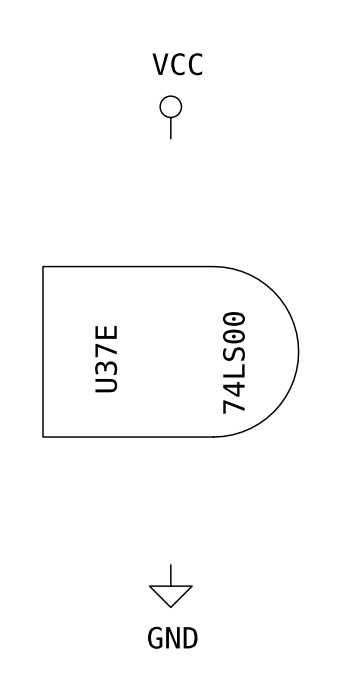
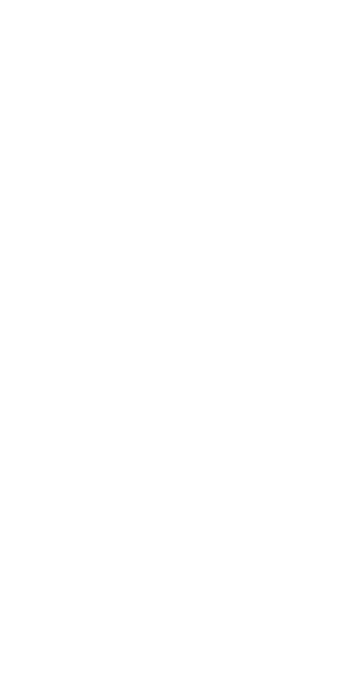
power symbol: VCC (170, 117) -> none
U37E: 74LS00 (170, 351) -> none
power symbol: GND (170, 586) -> none

